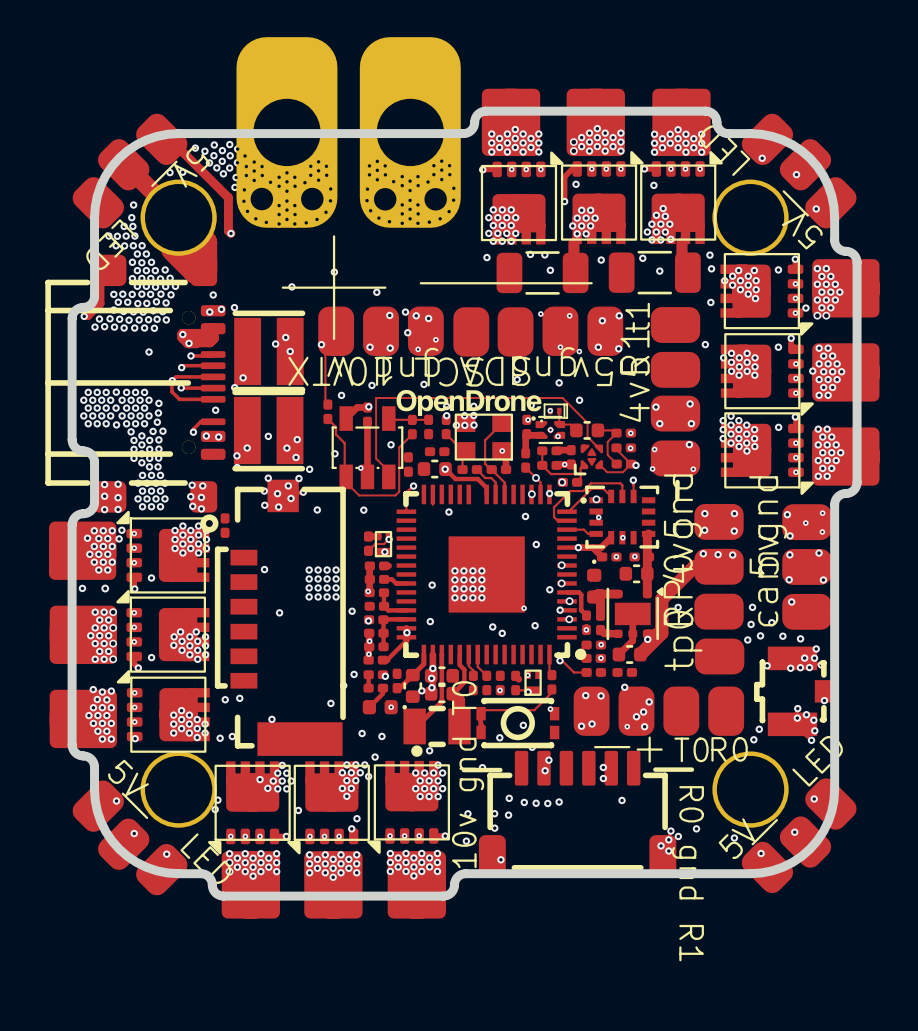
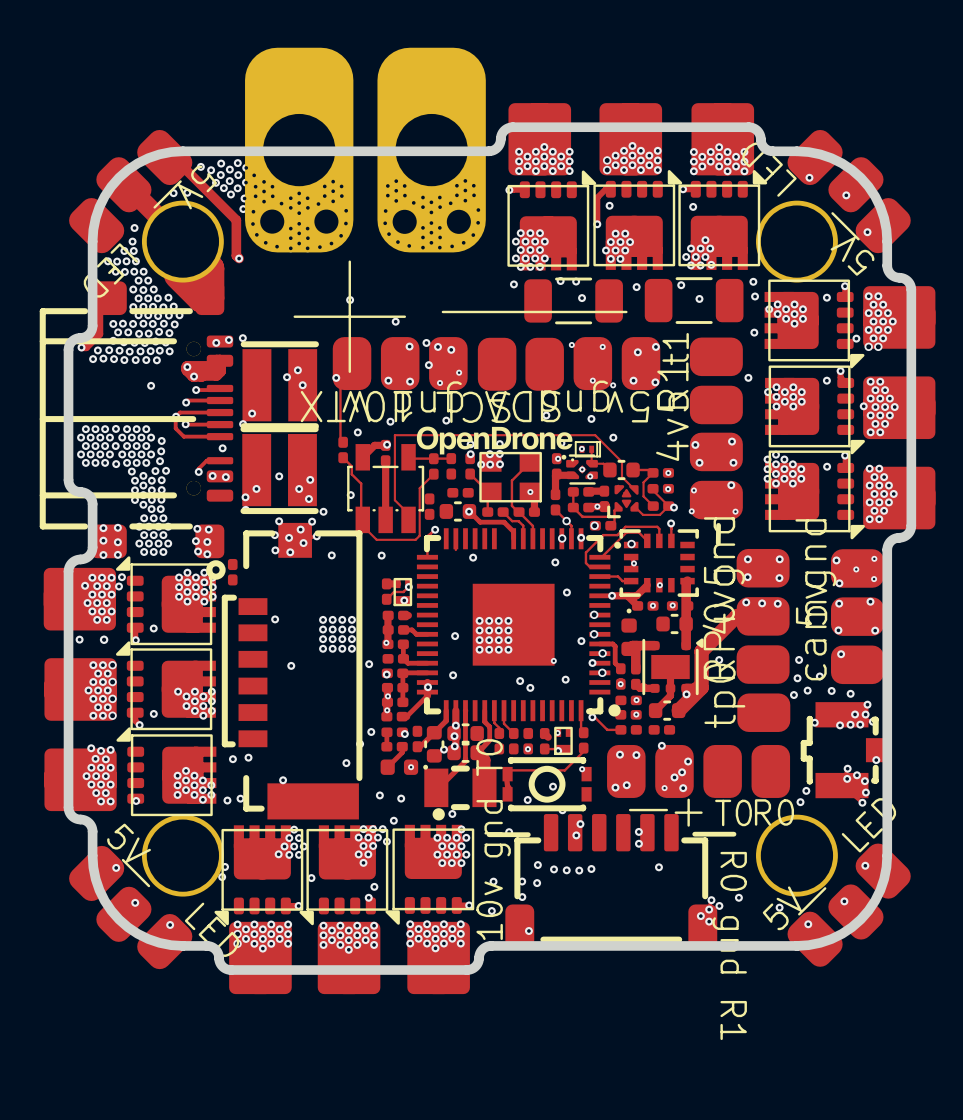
via: (591, 168) -> none
via: (606, 168) -> none
via: (620, 168) -> none
via: (670, 168) -> none
via: (685, 168) -> none
via: (700, 168) -> none
via: (511, 169) -> none
via: (526, 169) -> none
via: (540, 169) -> none
via: (663, 208) -> none
via: (656, 215) -> none
track: (573, 242) (573, 256) -> none
track: (682, 242) (682, 256) -> none
via: (738, 270) -> none
via: (754, 270) -> none
via: (795, 283) -> none
via: (291, 286) -> none
via: (213, 294) -> none
via: (755, 298) -> none
via: (795, 298) -> none
via: (795, 312) -> none
via: (795, 363) -> none
via: (739, 375) -> none
via: (754, 375) -> none
via: (795, 378) -> none
via: (795, 393) -> none
via: (795, 443) -> none
via: (391, 444) -> none
via: (739, 446) -> none
via: (754, 446) -> none
via: (746, 451) -> none
via: (795, 457) -> none
via: (360, 468) -> none
via: (795, 472) -> none
via: (134, 533) -> none
via: (134, 548) -> none
via: (134, 562) -> none
via: (134, 612) -> none
via: (134, 627) -> none
via: (180, 631) -> none
via: (196, 631) -> none
via: (134, 641) -> none
via: (173, 645) -> none
via: (134, 692) -> none
via: (134, 707) -> none
via: (134, 721) -> none
via: (260, 779) -> none
via: (230, 836) -> none
via: (245, 836) -> none
via: (259, 836) -> none
via: (309, 836) -> none
via: (324, 836) -> none
via: (339, 836) -> none
via: (390, 836) -> none
via: (404, 836) -> none
via: (419, 836) -> none

